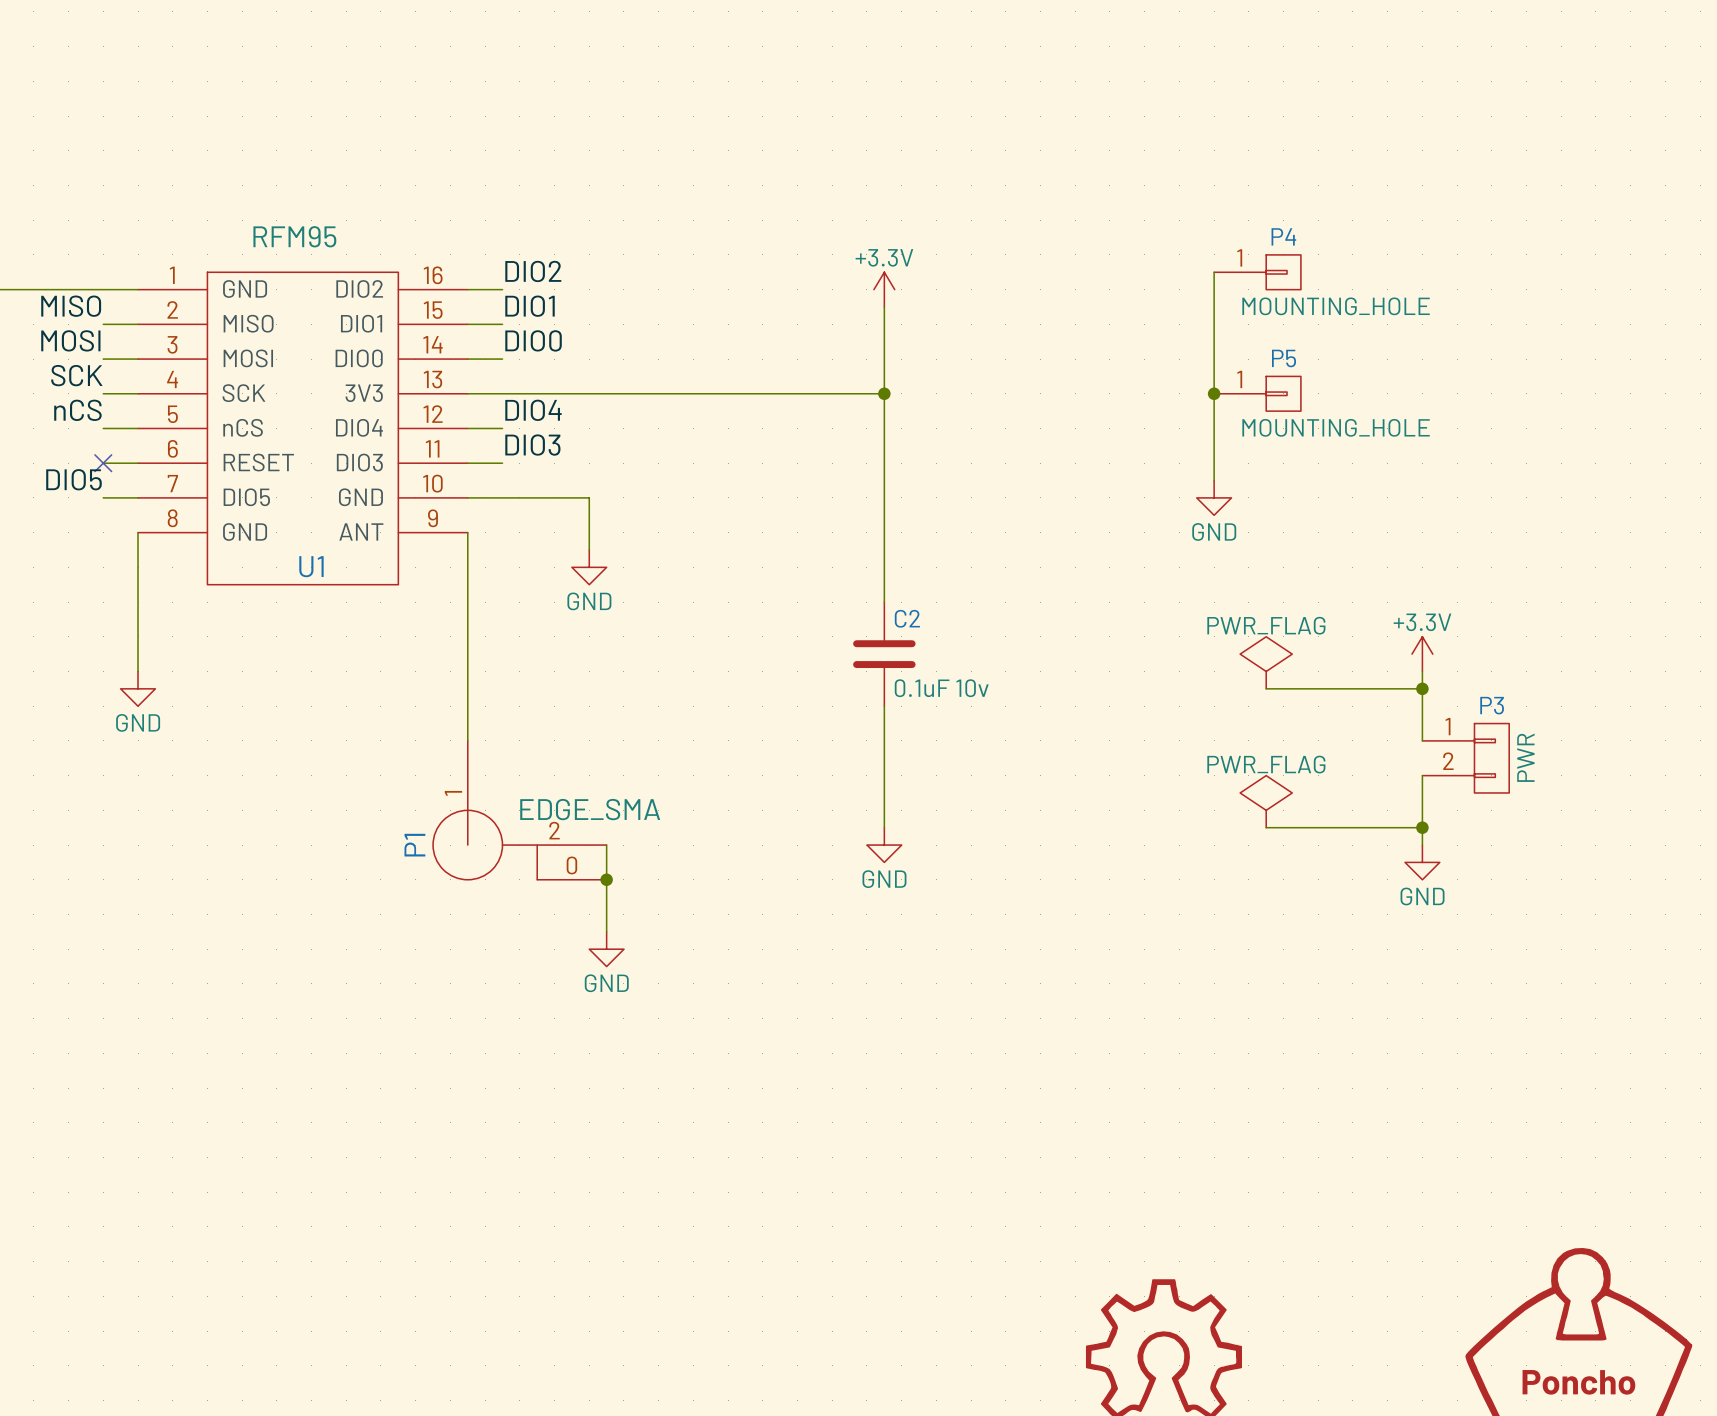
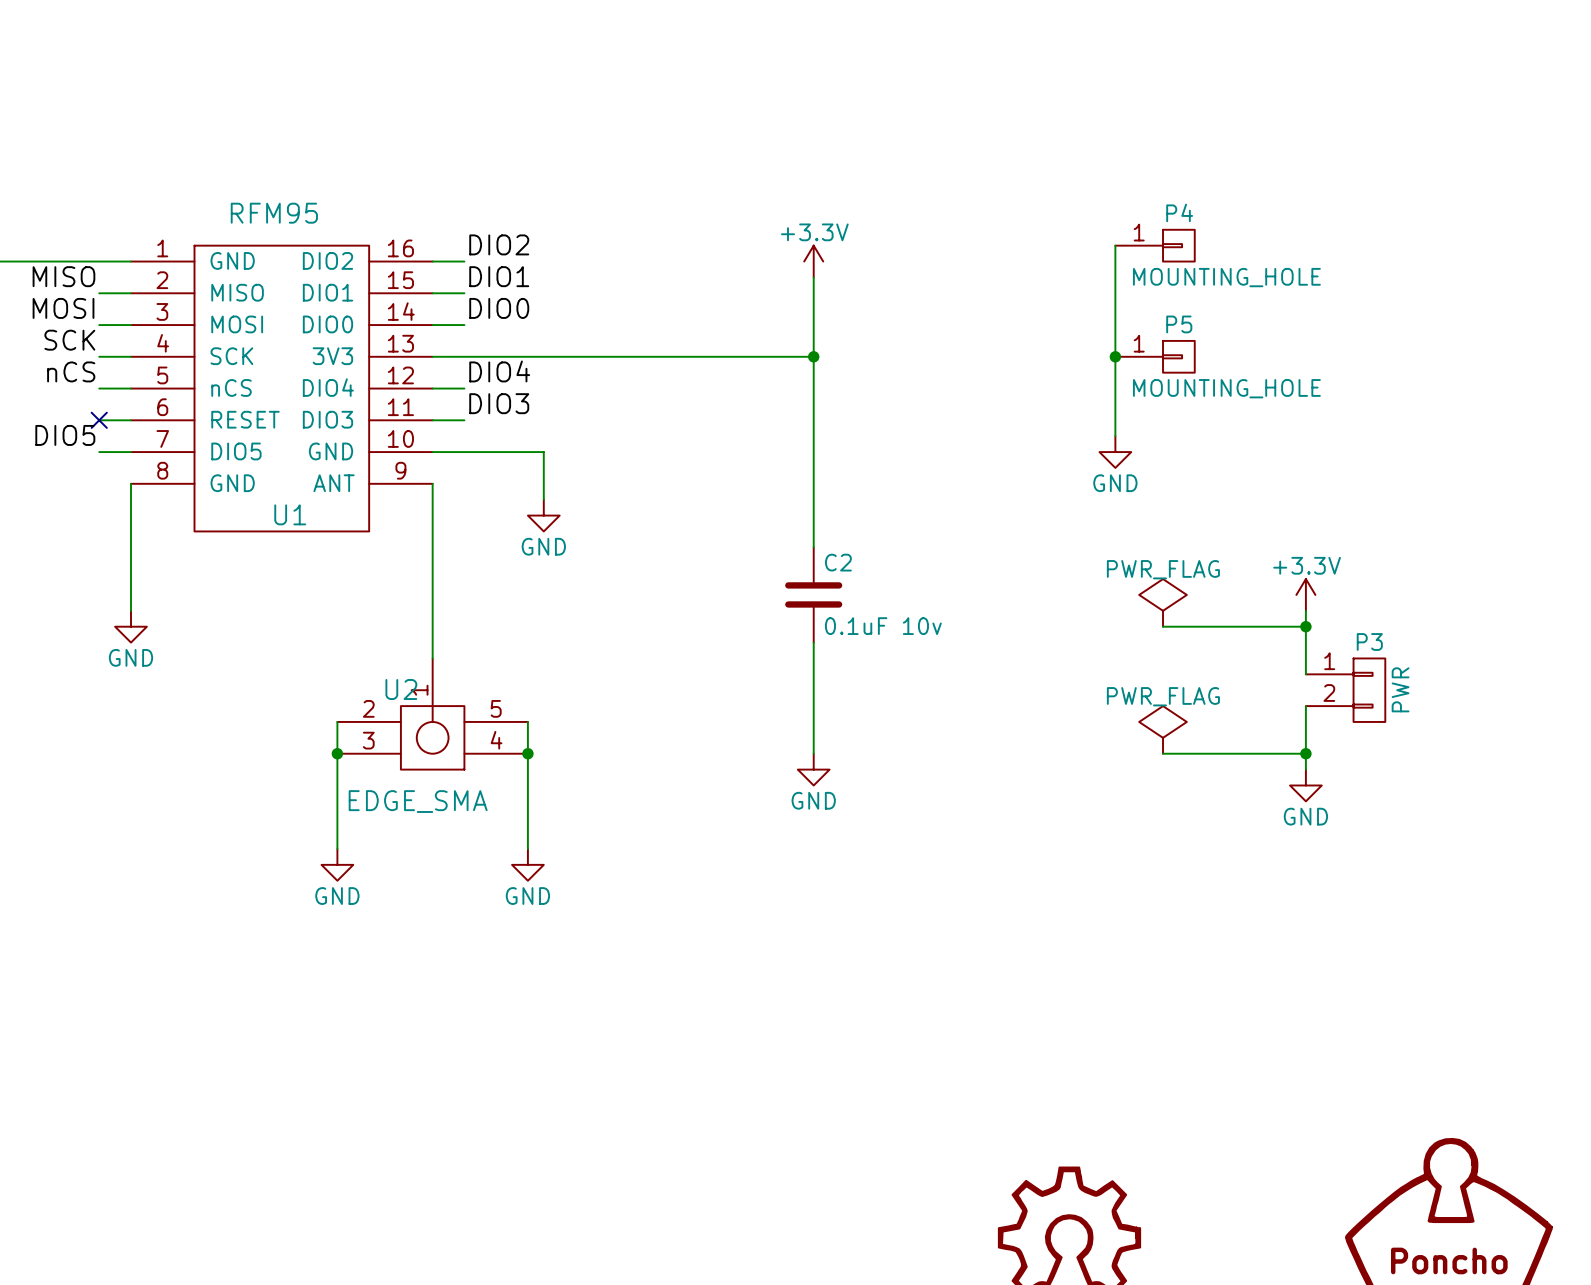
U2: none -> EDGE_SMA (432, 714)
wire: none -> (337, 721) (337, 848)
wire: none -> (527, 721) (527, 848)
P1: EDGE_SMA (519, 810) -> none
junction: none -> (337, 753)
wire: (606, 845) (606, 931) -> none
junction position: (606, 879) -> (527, 753)
power symbol: none -> GND (337, 864)
power symbol position: GND (606, 949) -> GND (527, 864)

